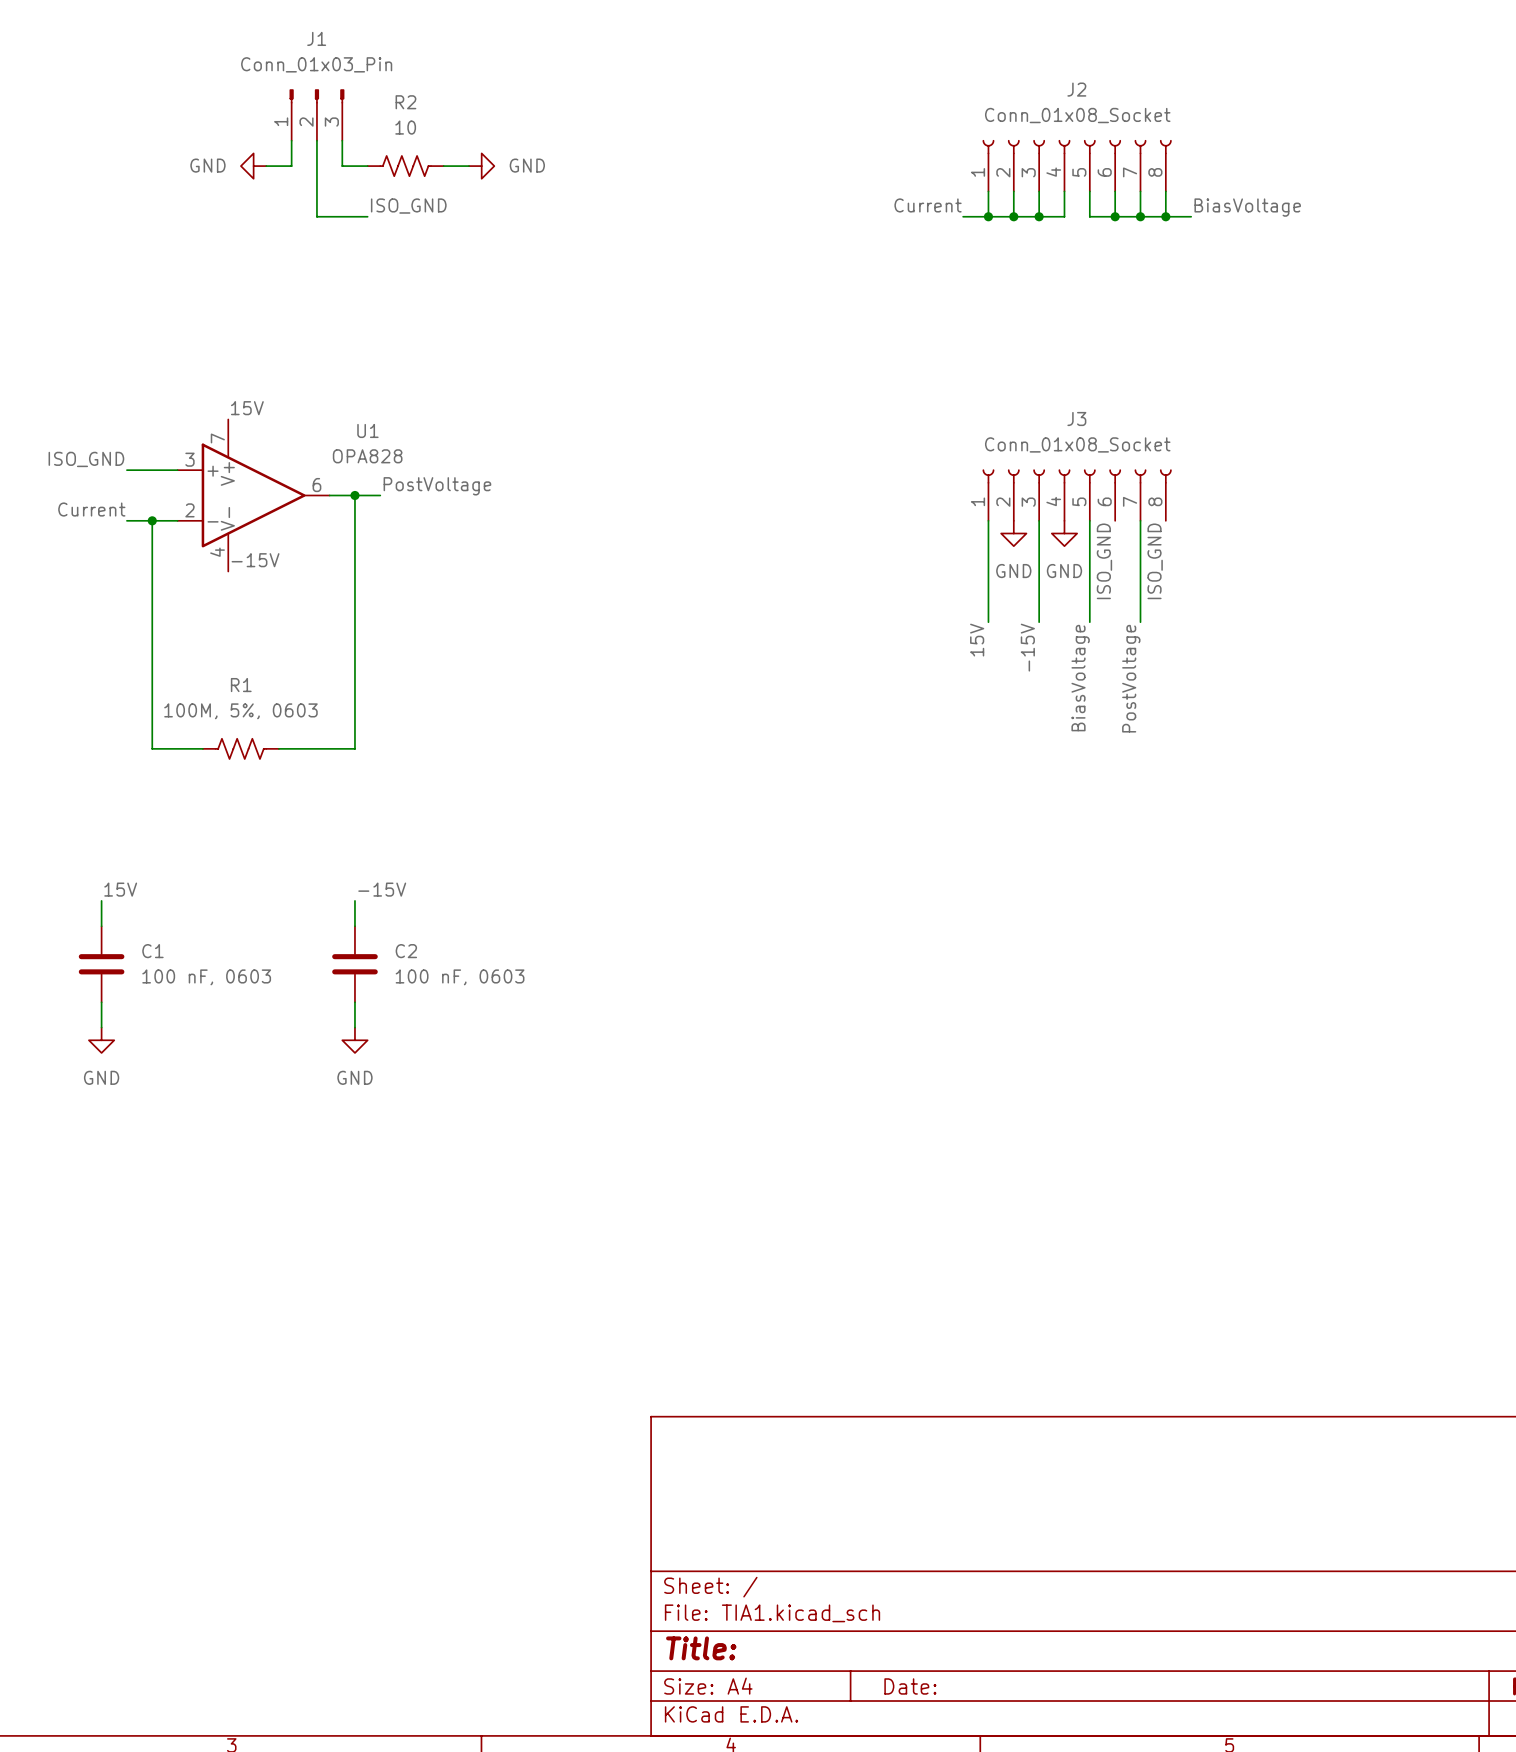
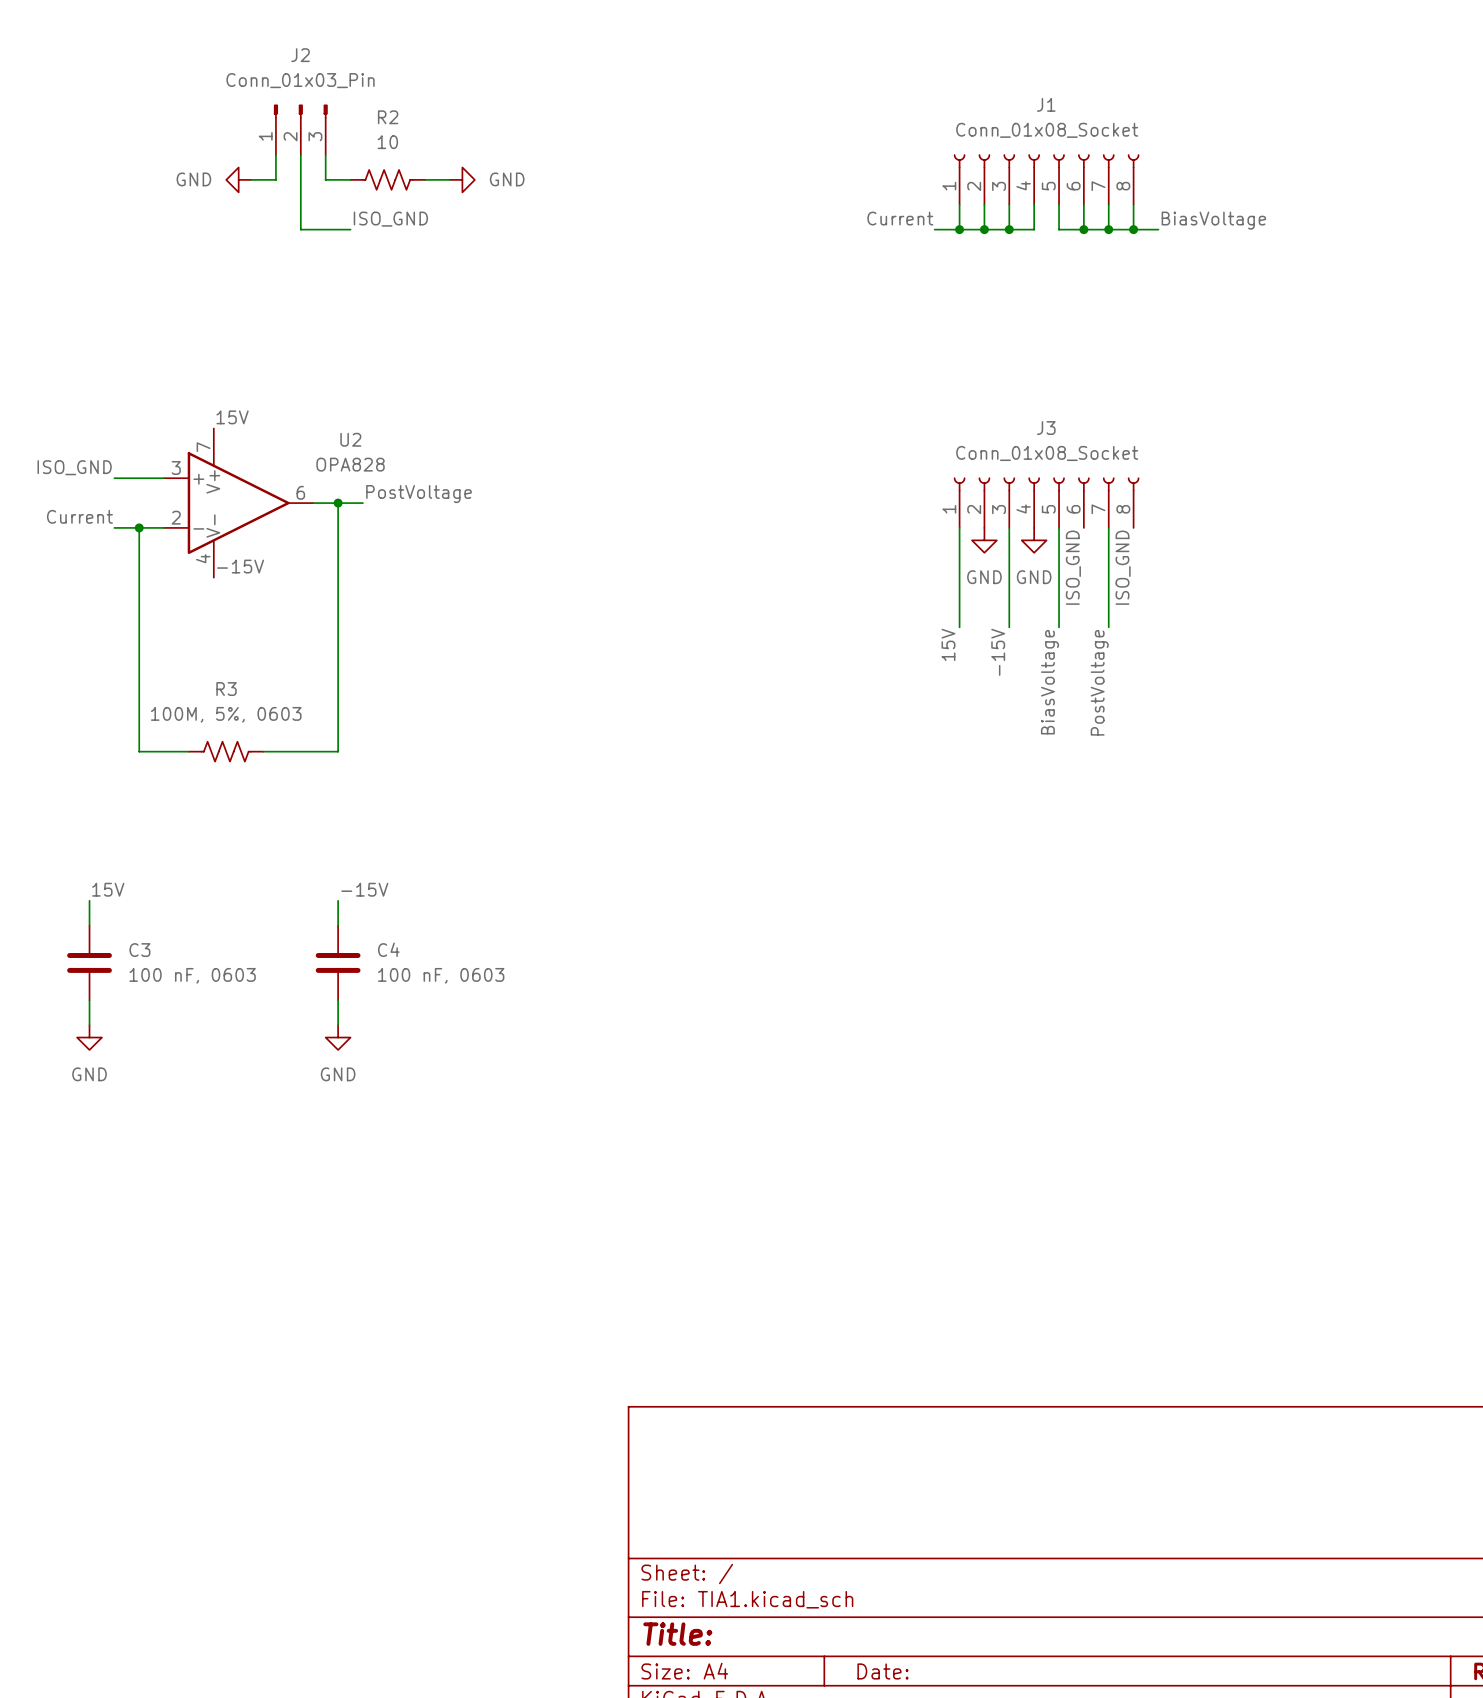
J1 name: J1 (316, 38) -> J2 (300, 55)
J2 name: J2 (1076, 89) -> J1 (1046, 104)
U1 name: U1 (367, 430) -> U2 (350, 439)
R1 name: R1 (241, 685) -> R3 (226, 689)
C1 name: C1 (152, 951) -> C3 (139, 950)
C2 name: C2 (406, 951) -> C4 (388, 949)

